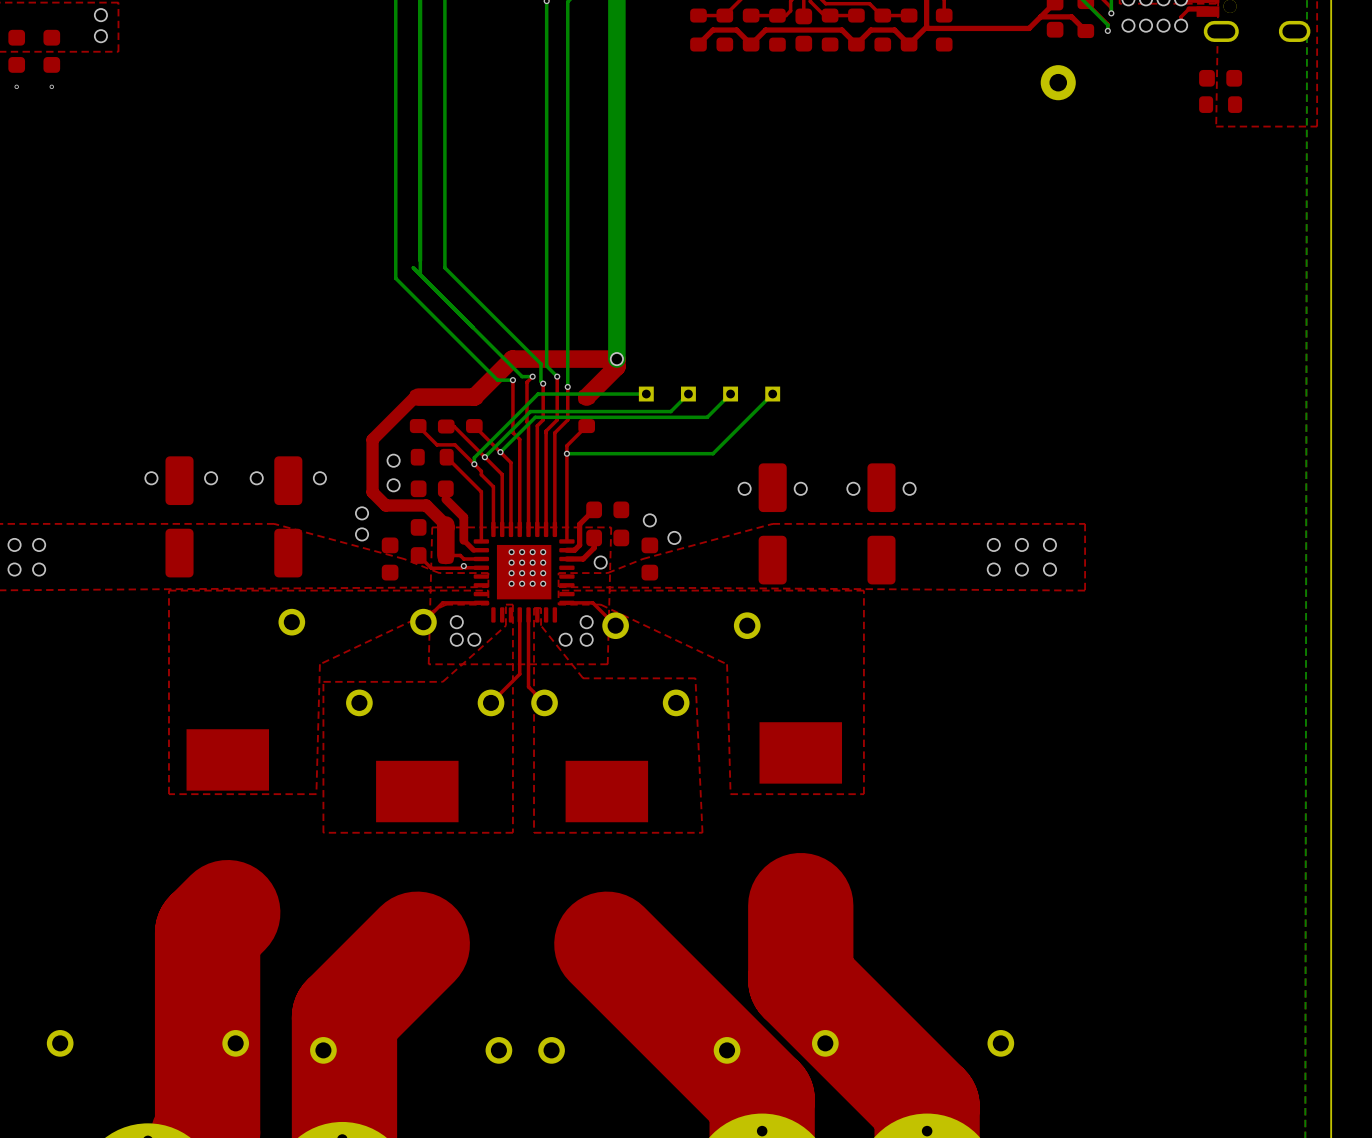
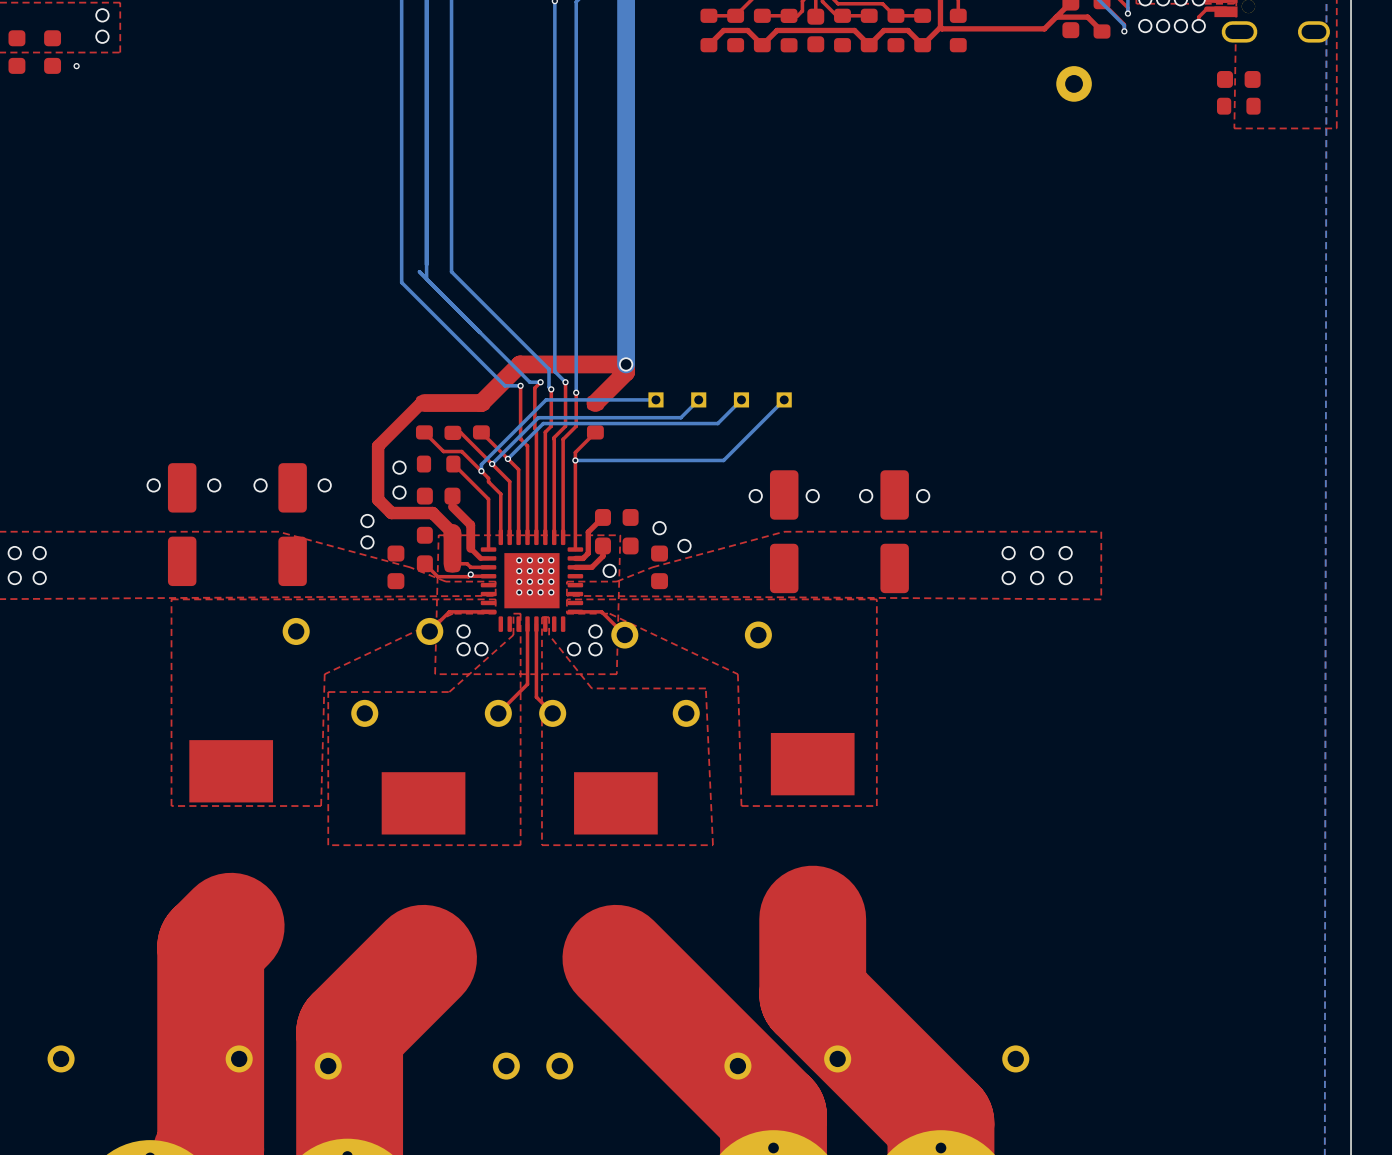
via: none -> (76, 66)
via: (16, 86) -> none
via: (51, 86) -> none

